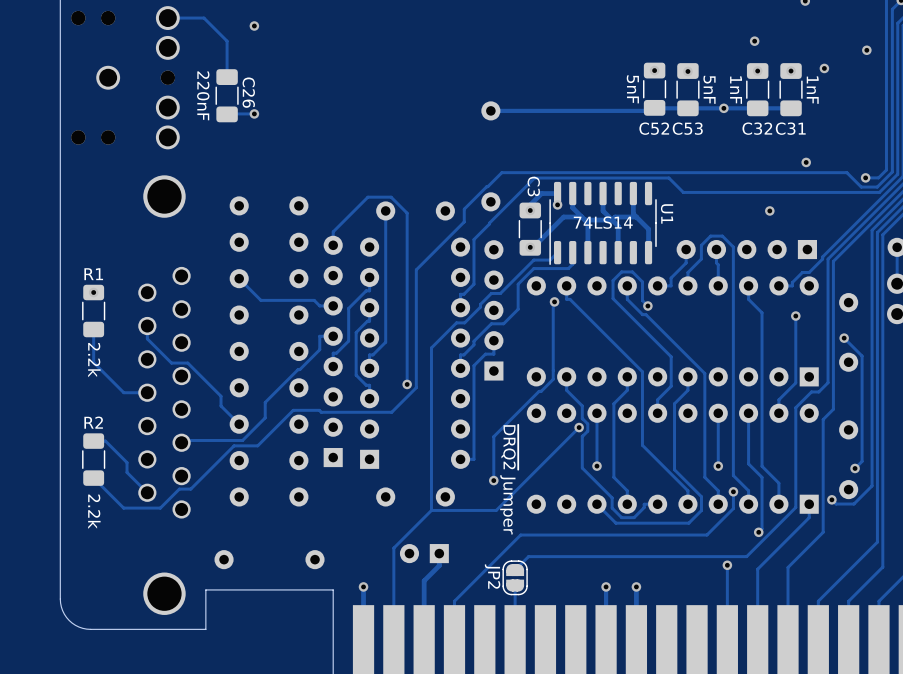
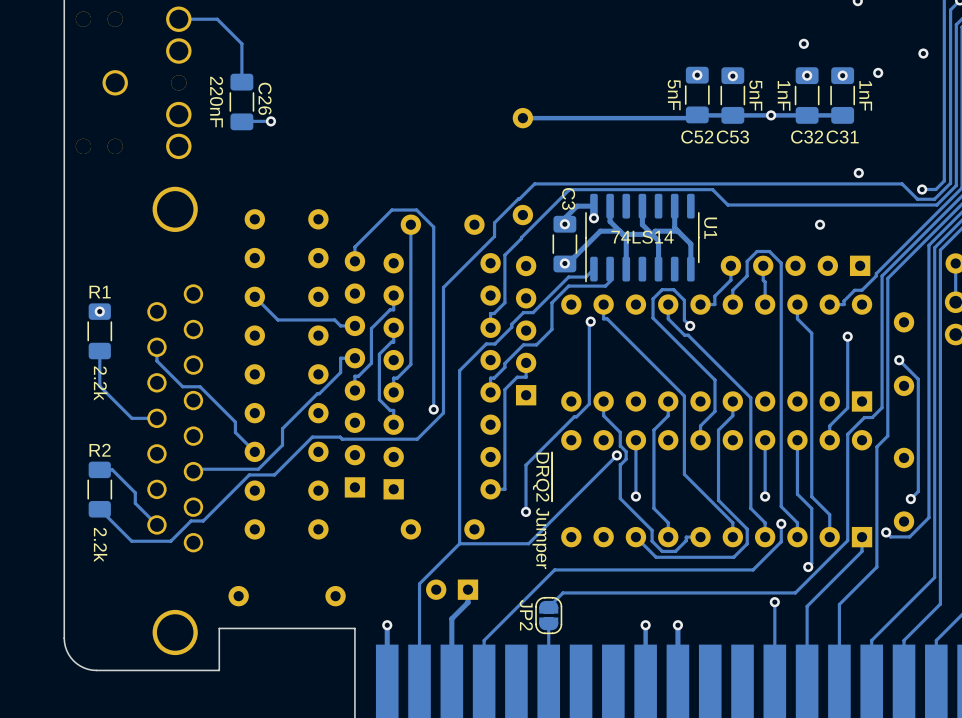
via: (254, 26) -> none

